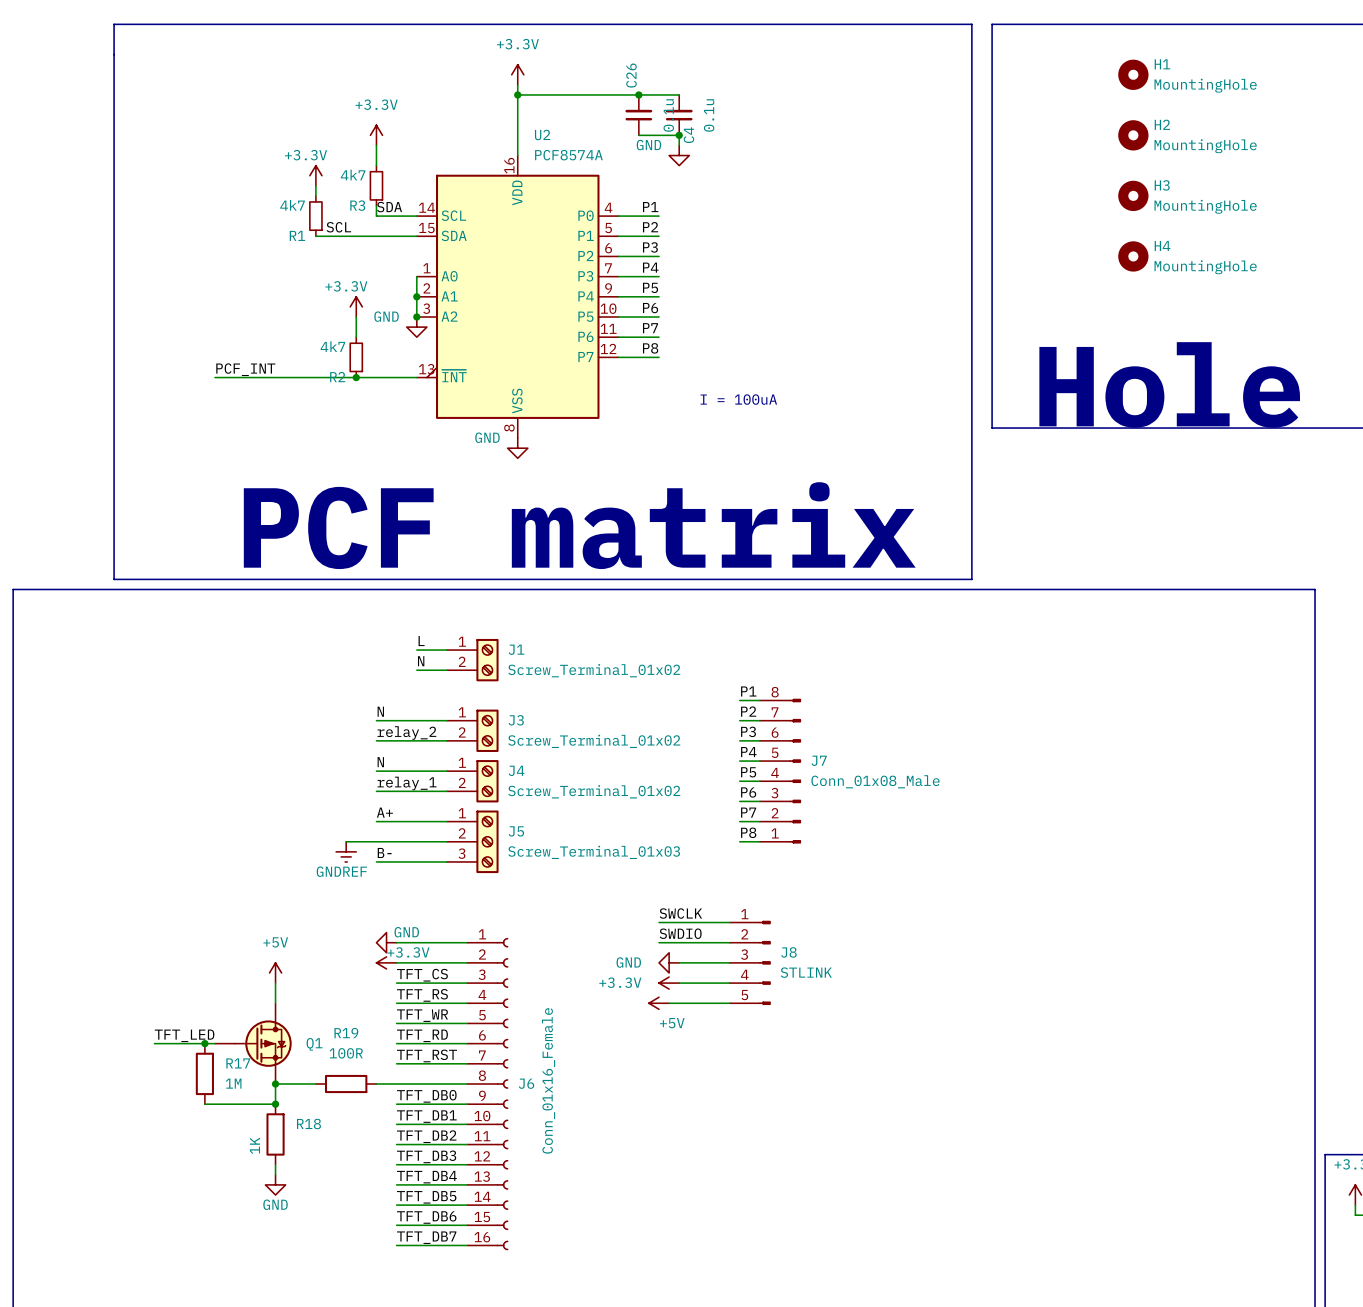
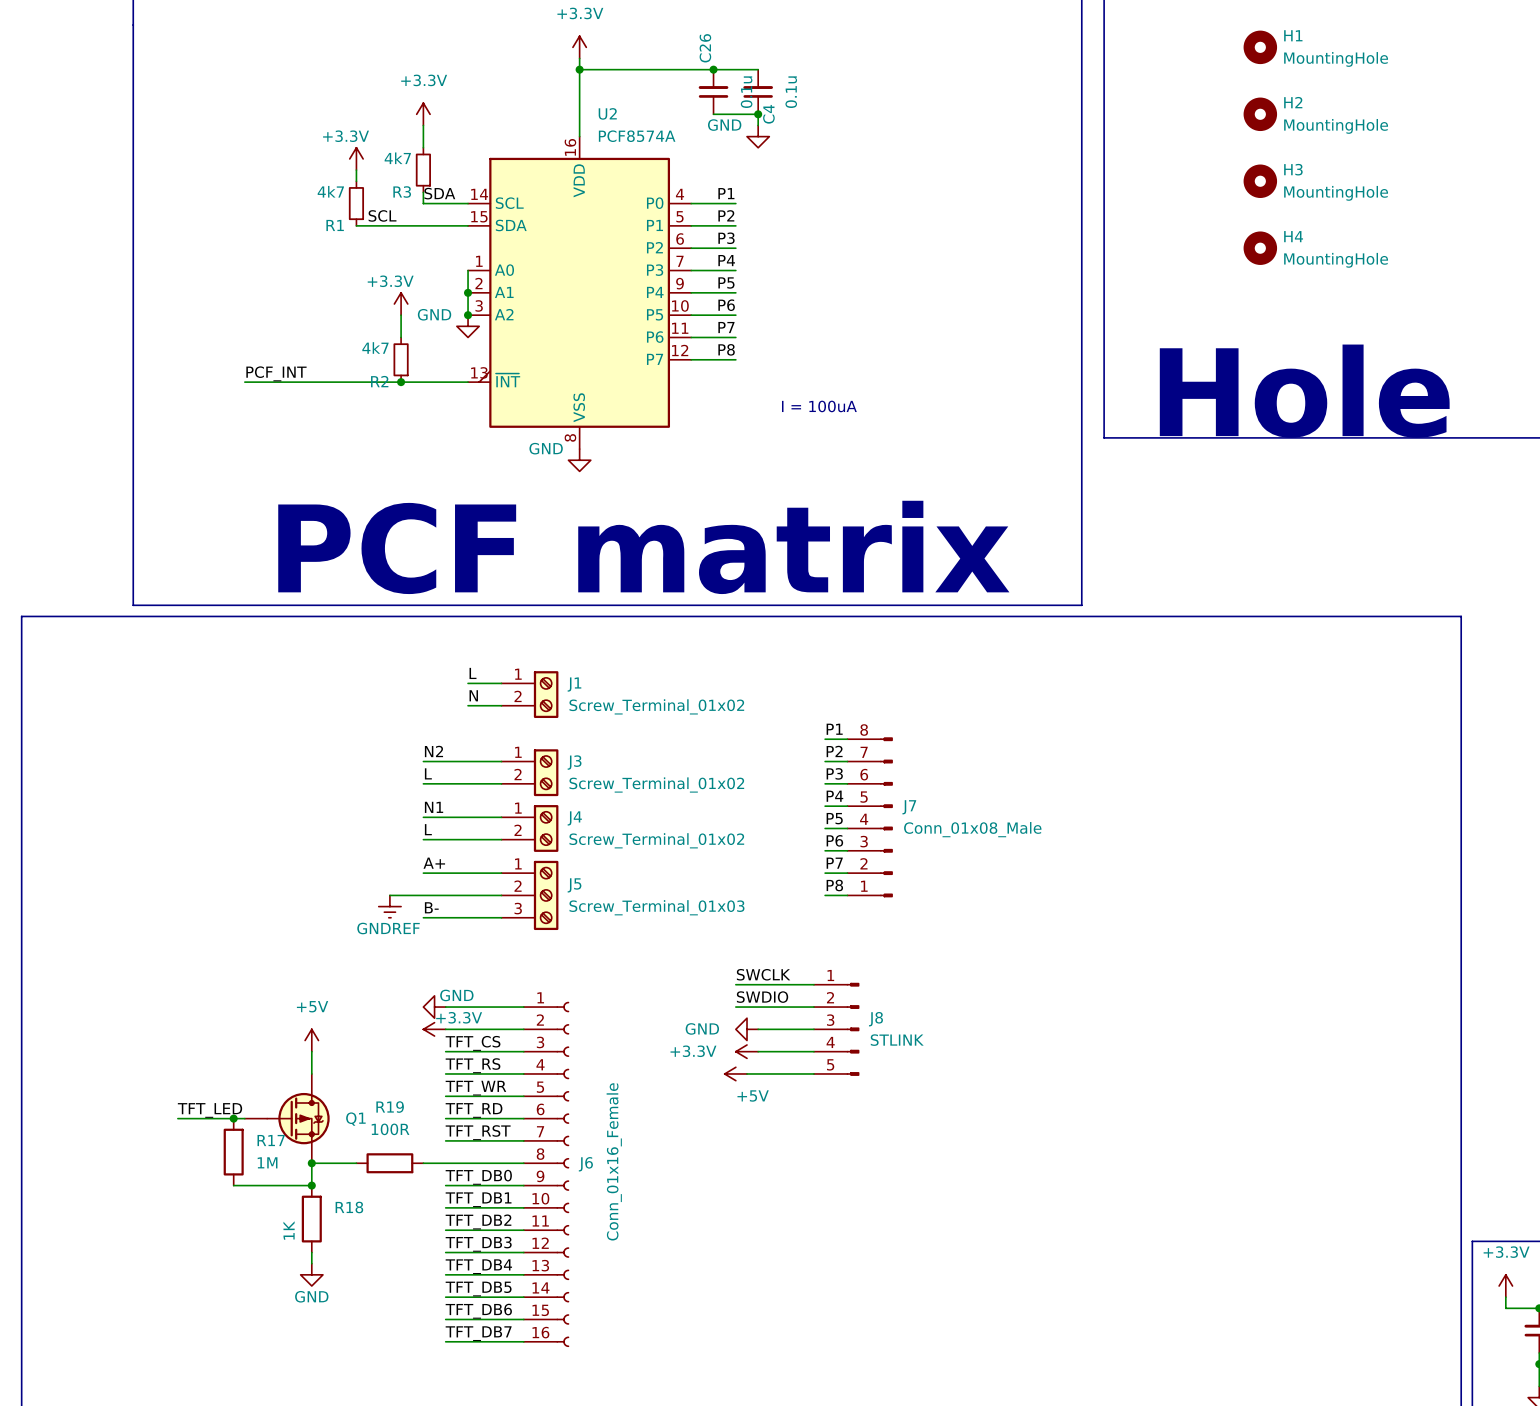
label: N (380, 711) -> N2 (433, 751)
label: relay_2 (406, 733) -> L (428, 773)
label: N (380, 762) -> N1 (434, 807)
label: relay_1 (407, 783) -> L (428, 829)

